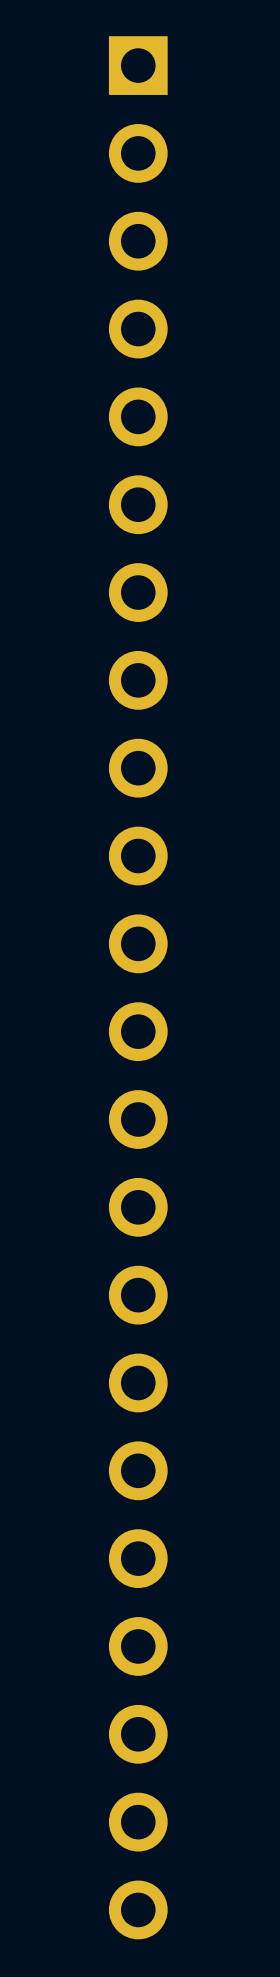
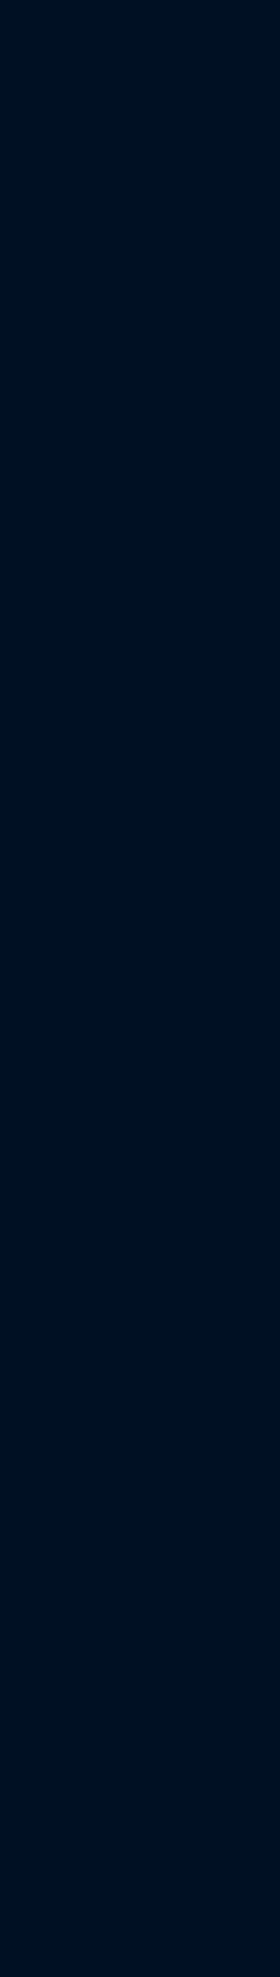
part: (138, 987) -> none

